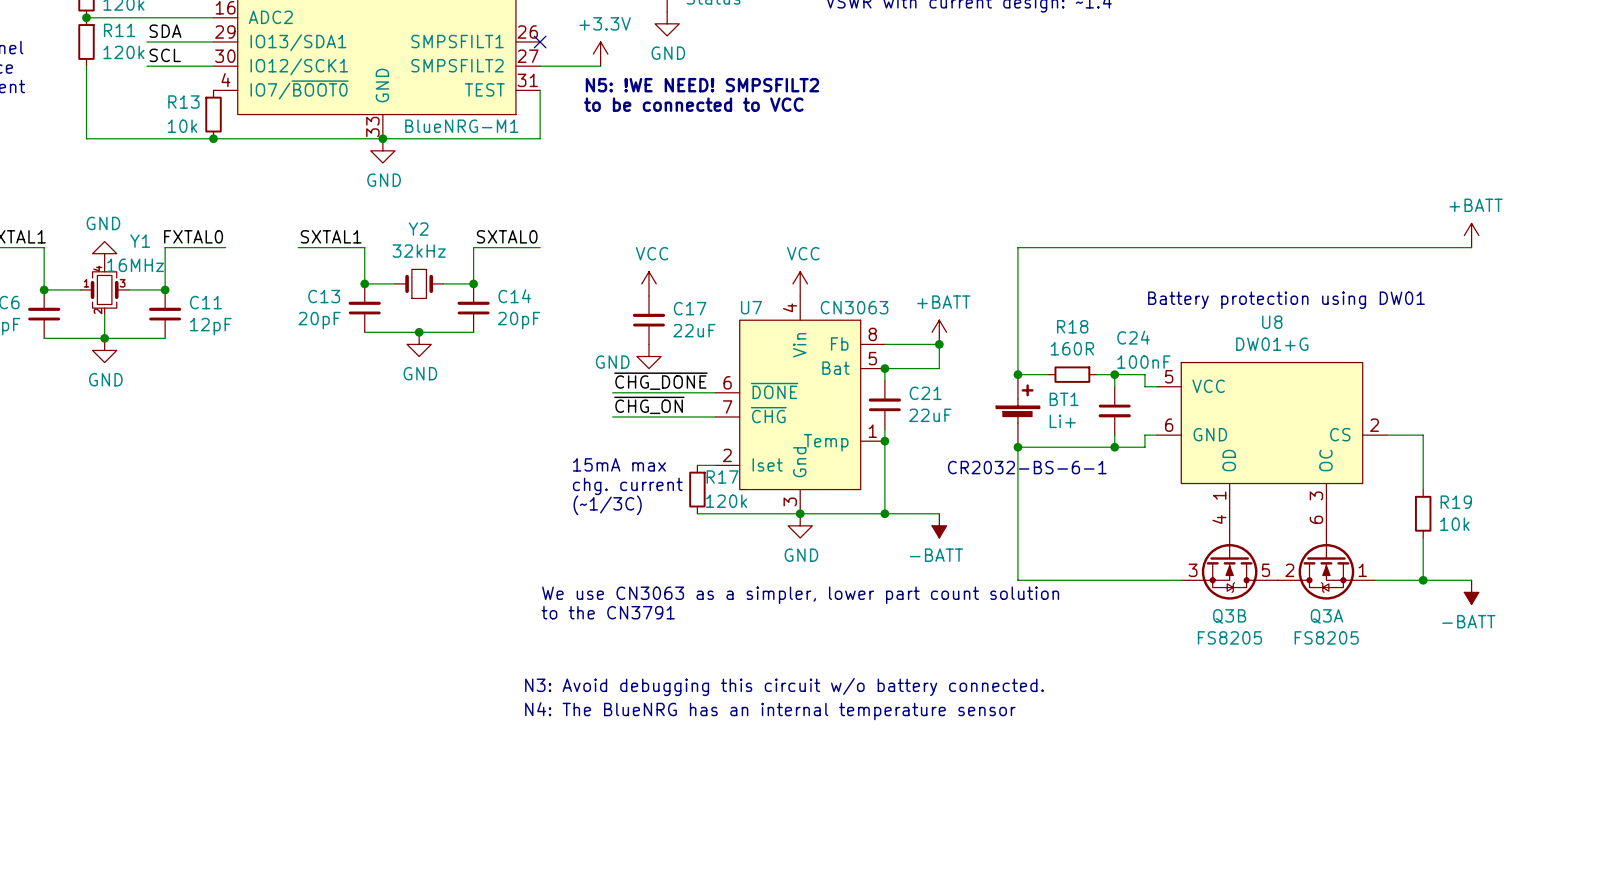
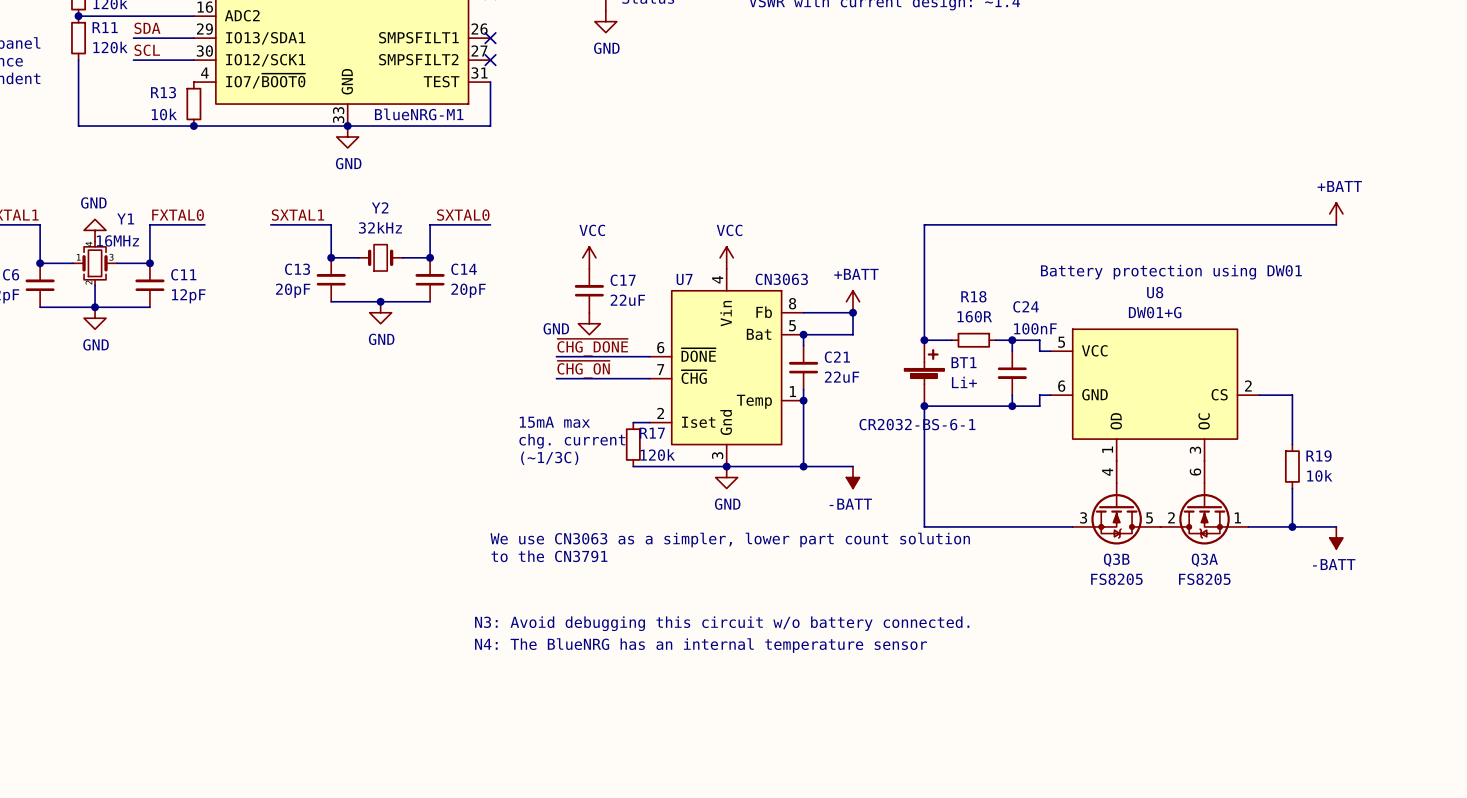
power symbol: +3.3V (600, 54) -> none
wire: (540, 66) (600, 66) -> none
no-connect mark: none -> (490, 60)
text: N5: !WE NEED! SMPSFILT2 (702, 85) -> none
text: to be connected to VCC (693, 104) -> none

